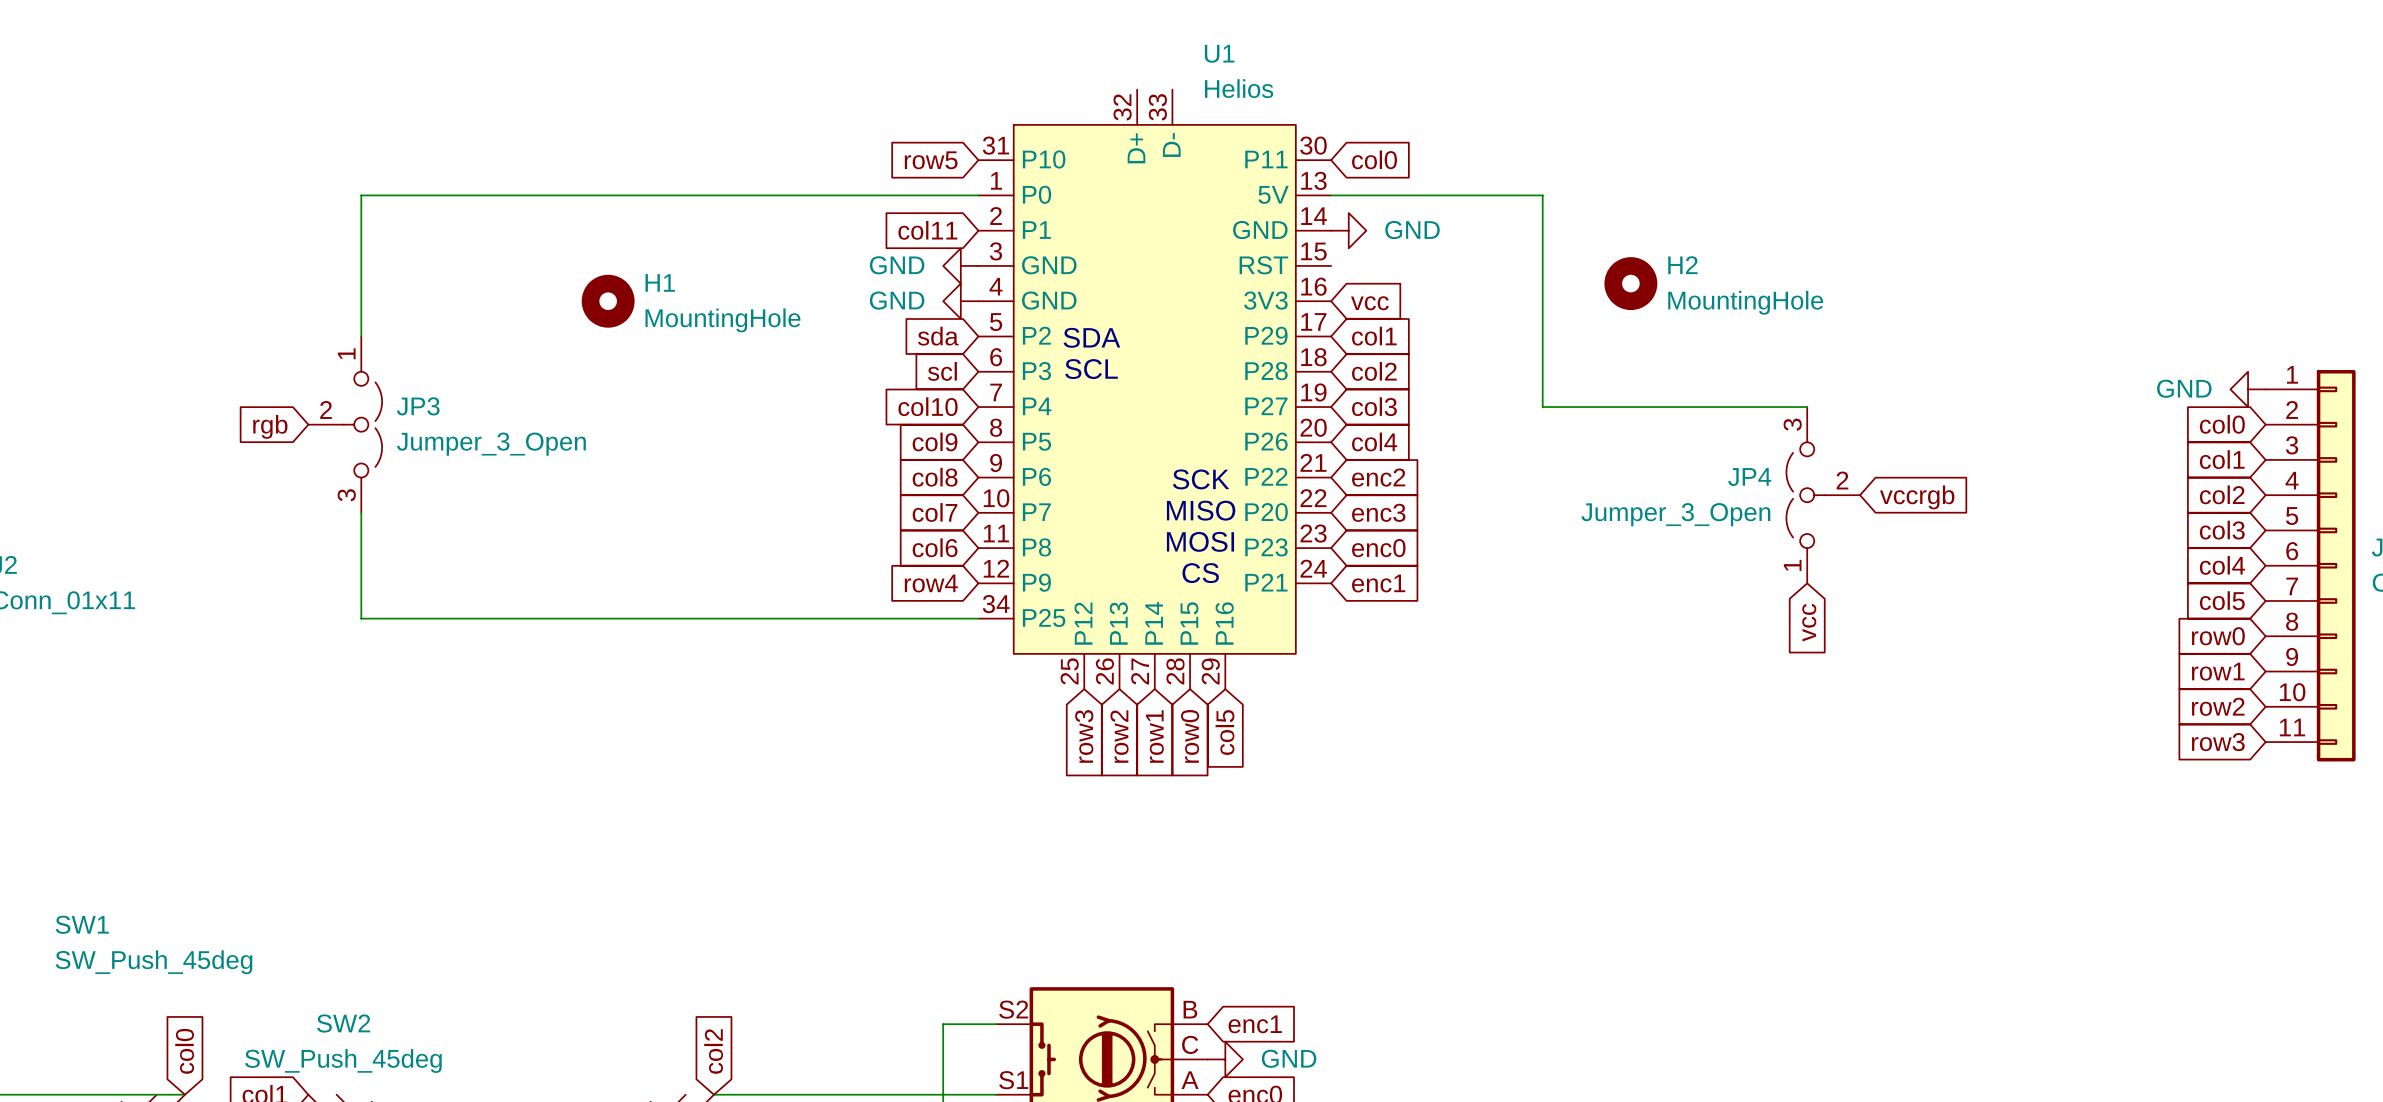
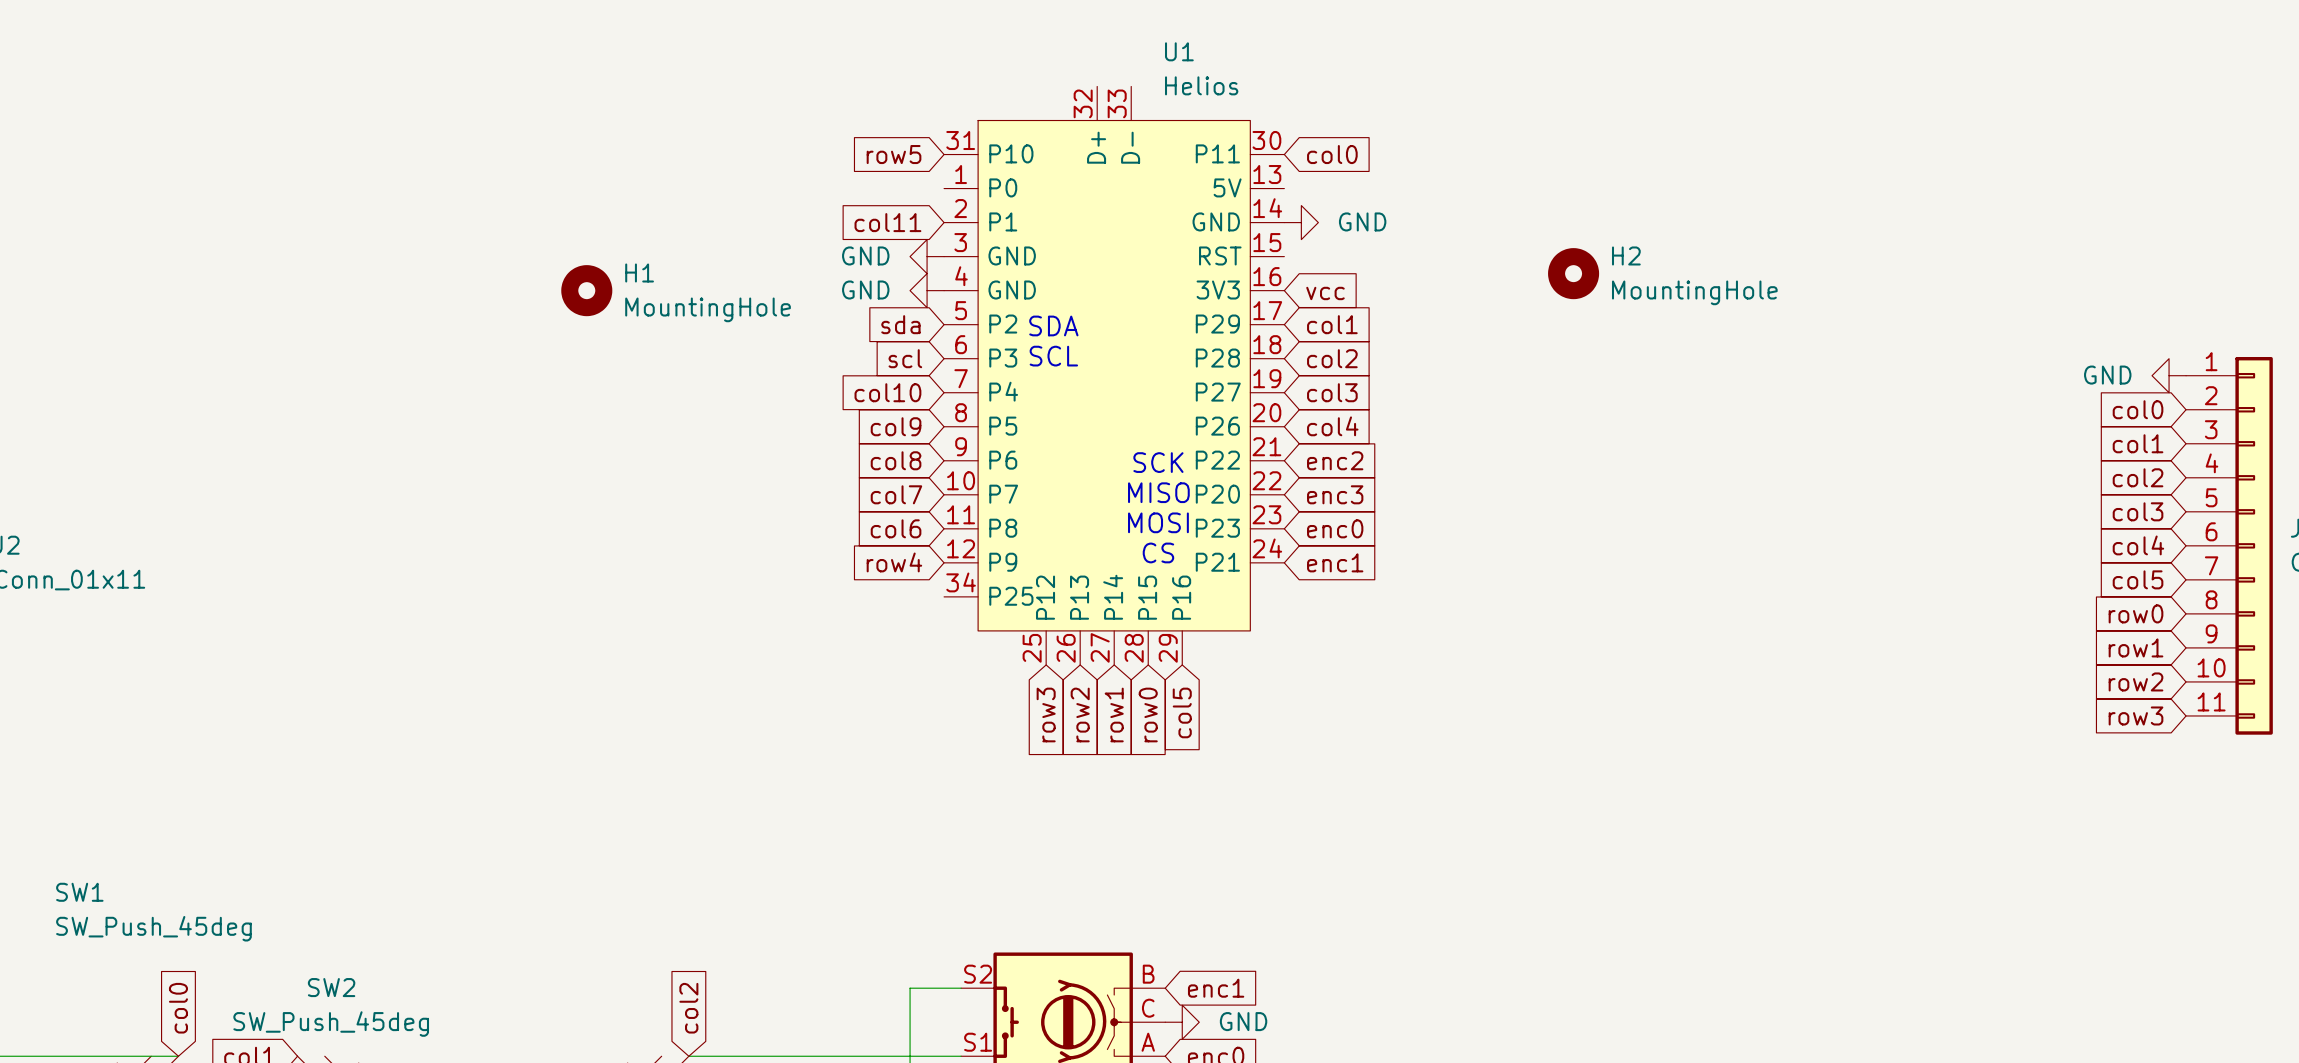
wire: (978, 195) (361, 195) (361, 336) -> none
wire: (1331, 195) (1542, 195) (1542, 407) (1807, 407) -> none
JP3: Jumper_3_Open (345, 424) -> none
global label: rgb (270, 426) -> none
JP4: Jumper_3_Open (1823, 495) -> none
global label: vccrgb (1917, 497) -> none
wire: (361, 512) (361, 618) (978, 618) -> none
global label: vcc (1809, 622) -> none

